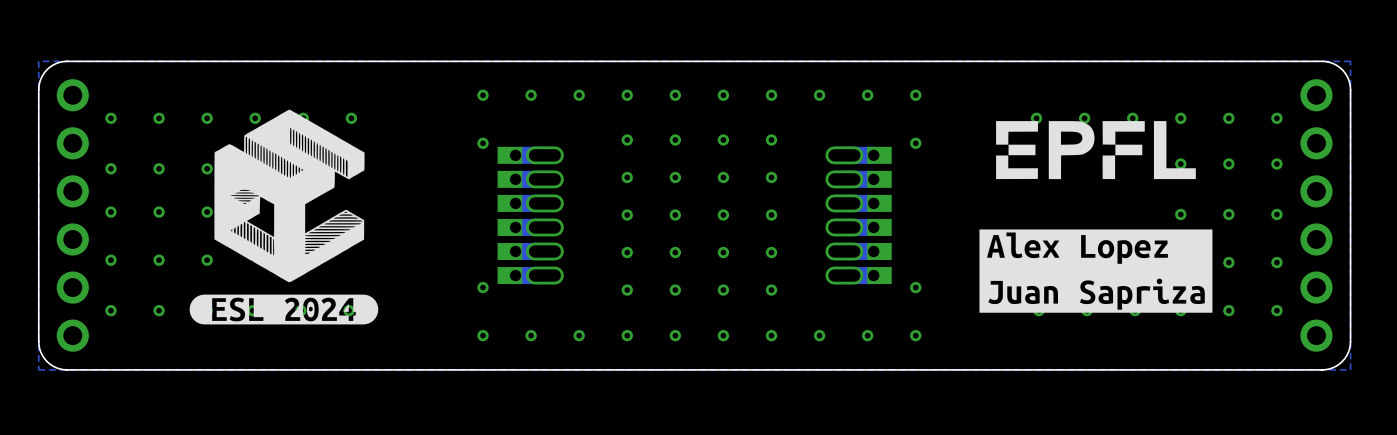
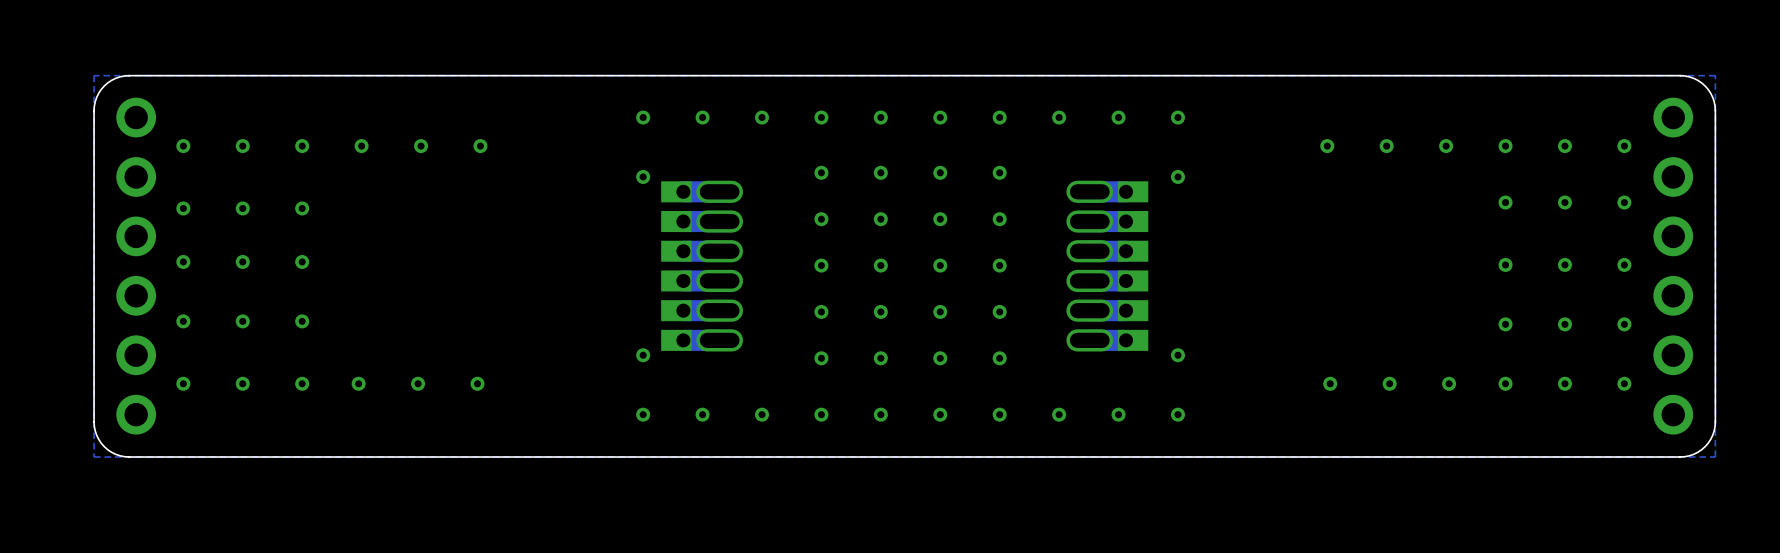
drawing: [189, 109, 379, 325] -> none
drawing: [996, 121, 1196, 180] -> none
drawing: [979, 229, 1213, 313] -> none

